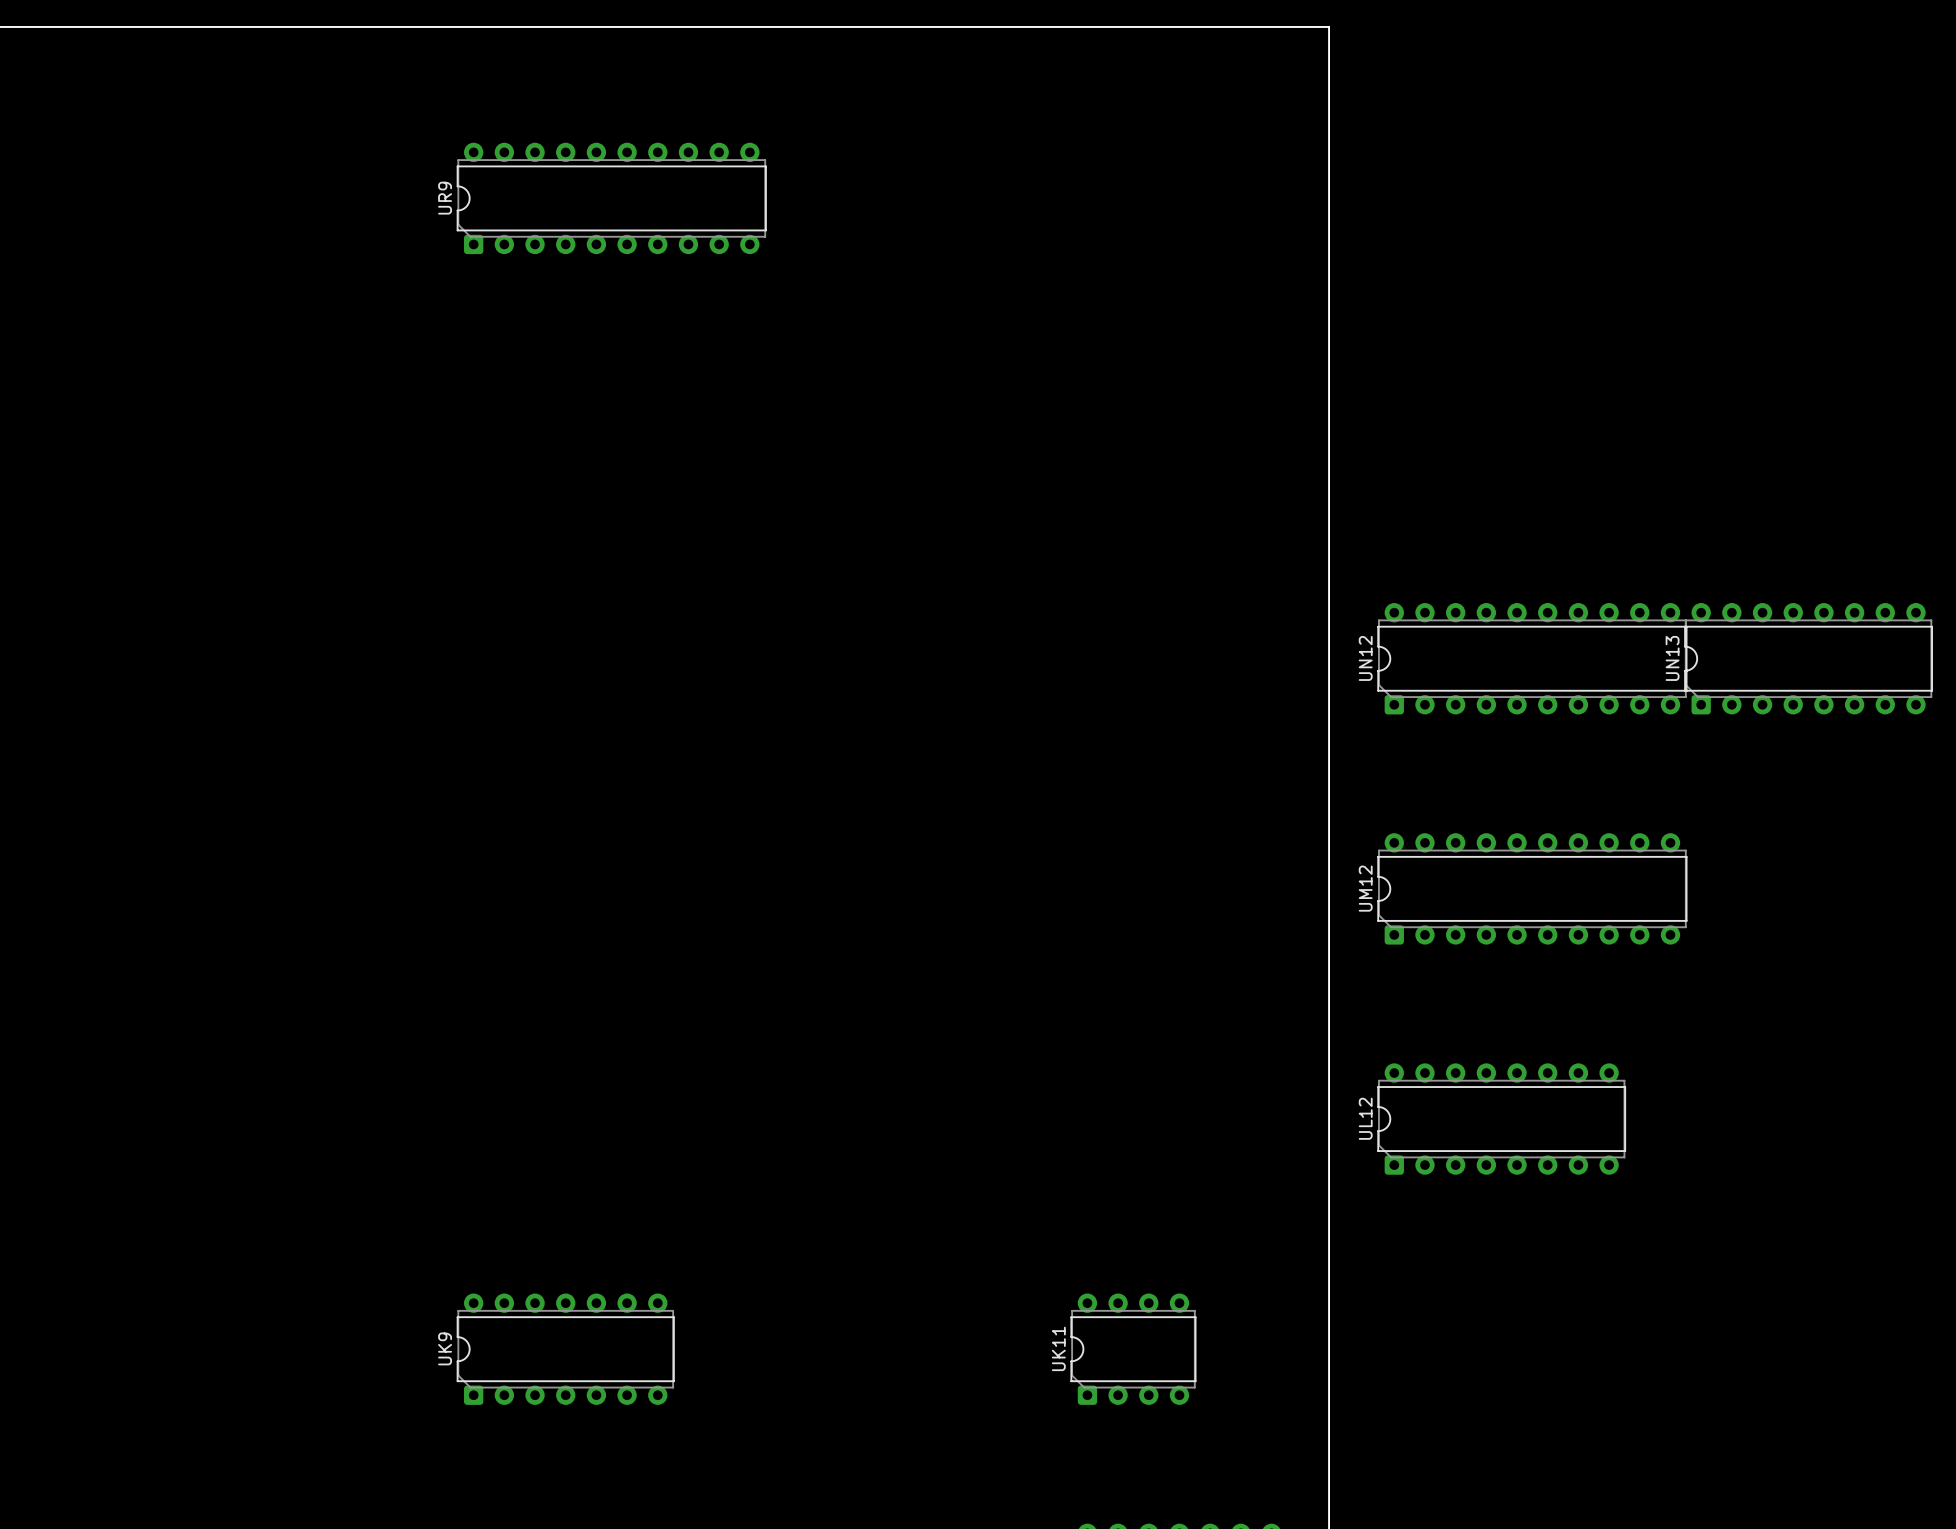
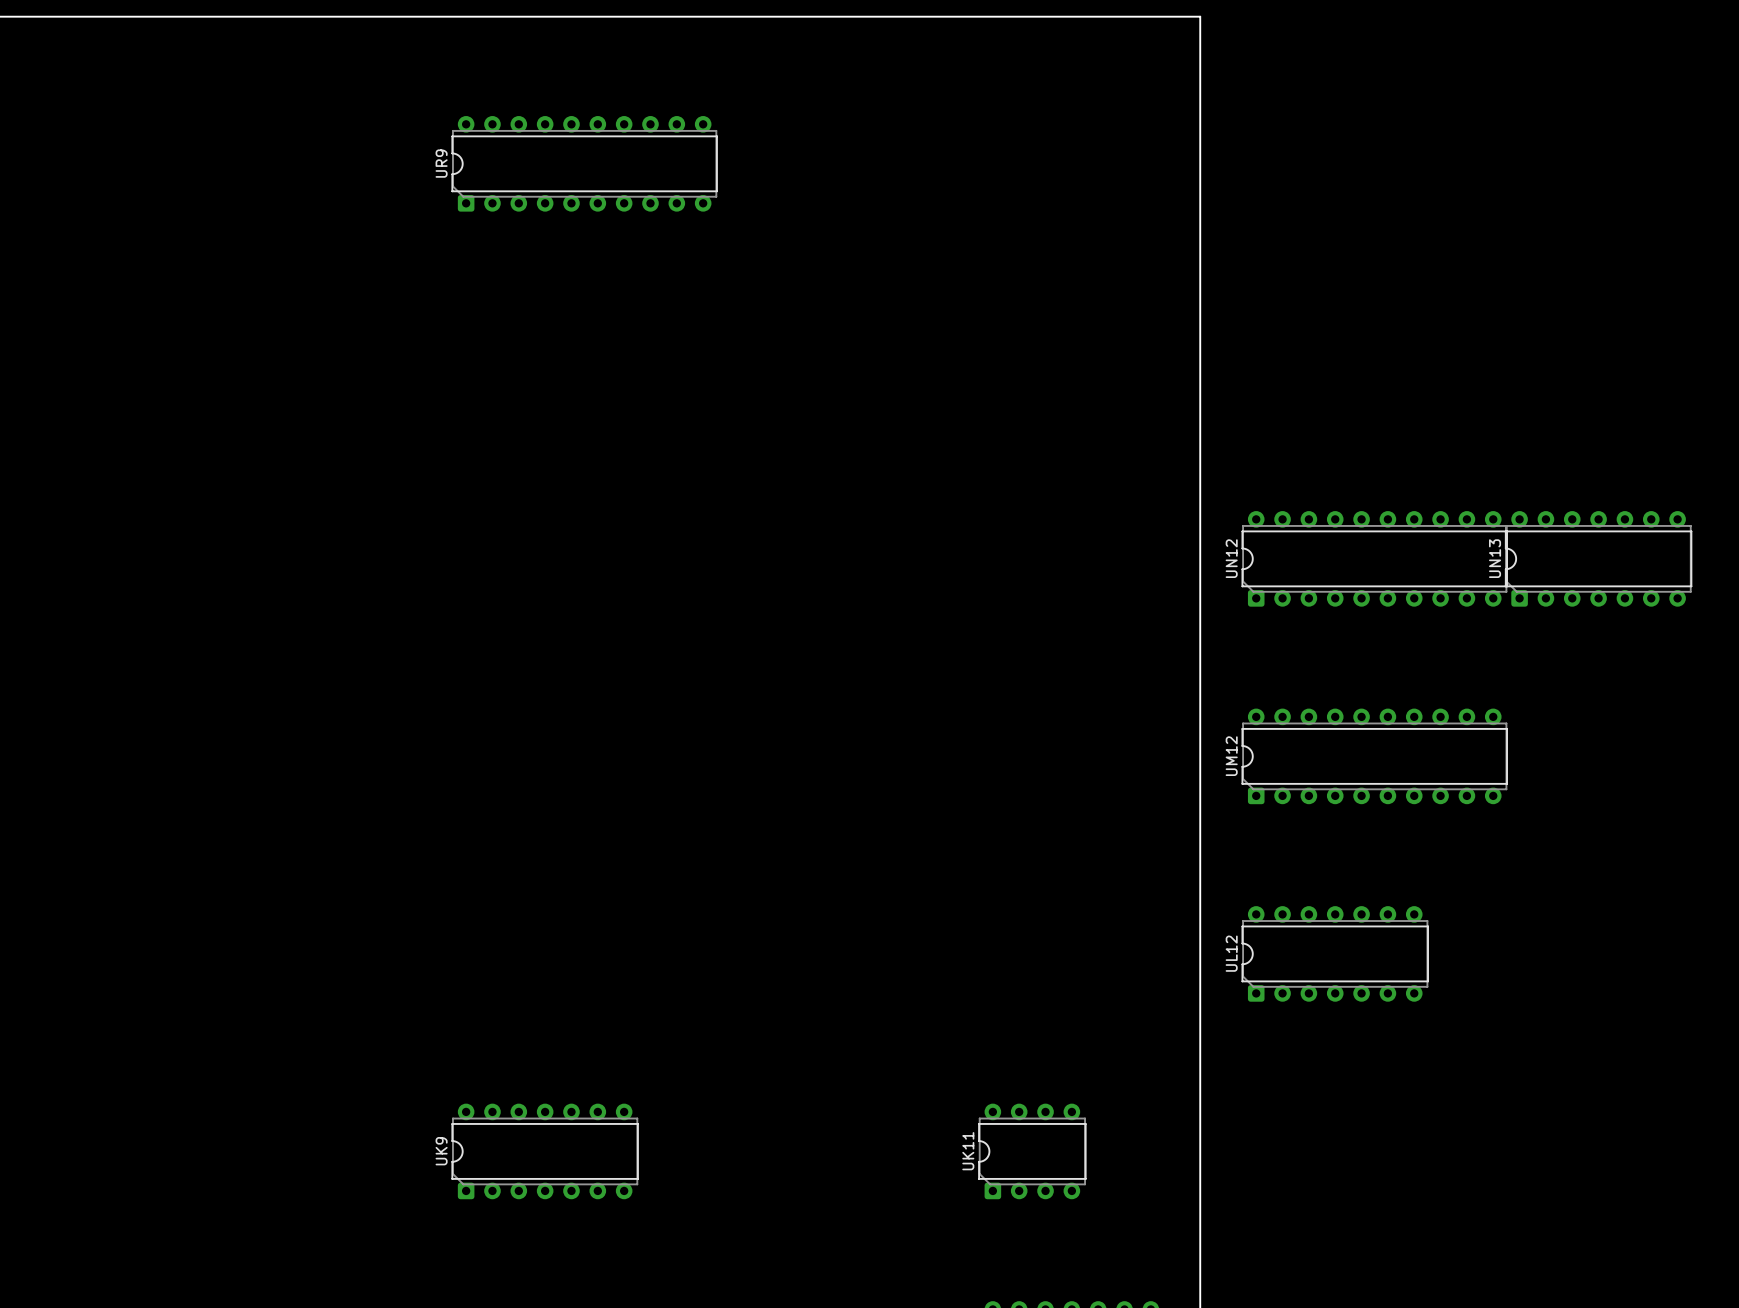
UN13 footprint: [1684, 603, 1933, 715] -> [1505, 511, 1693, 607]
UL12 footprint: [1377, 1063, 1626, 1175] -> [1241, 906, 1429, 1002]

